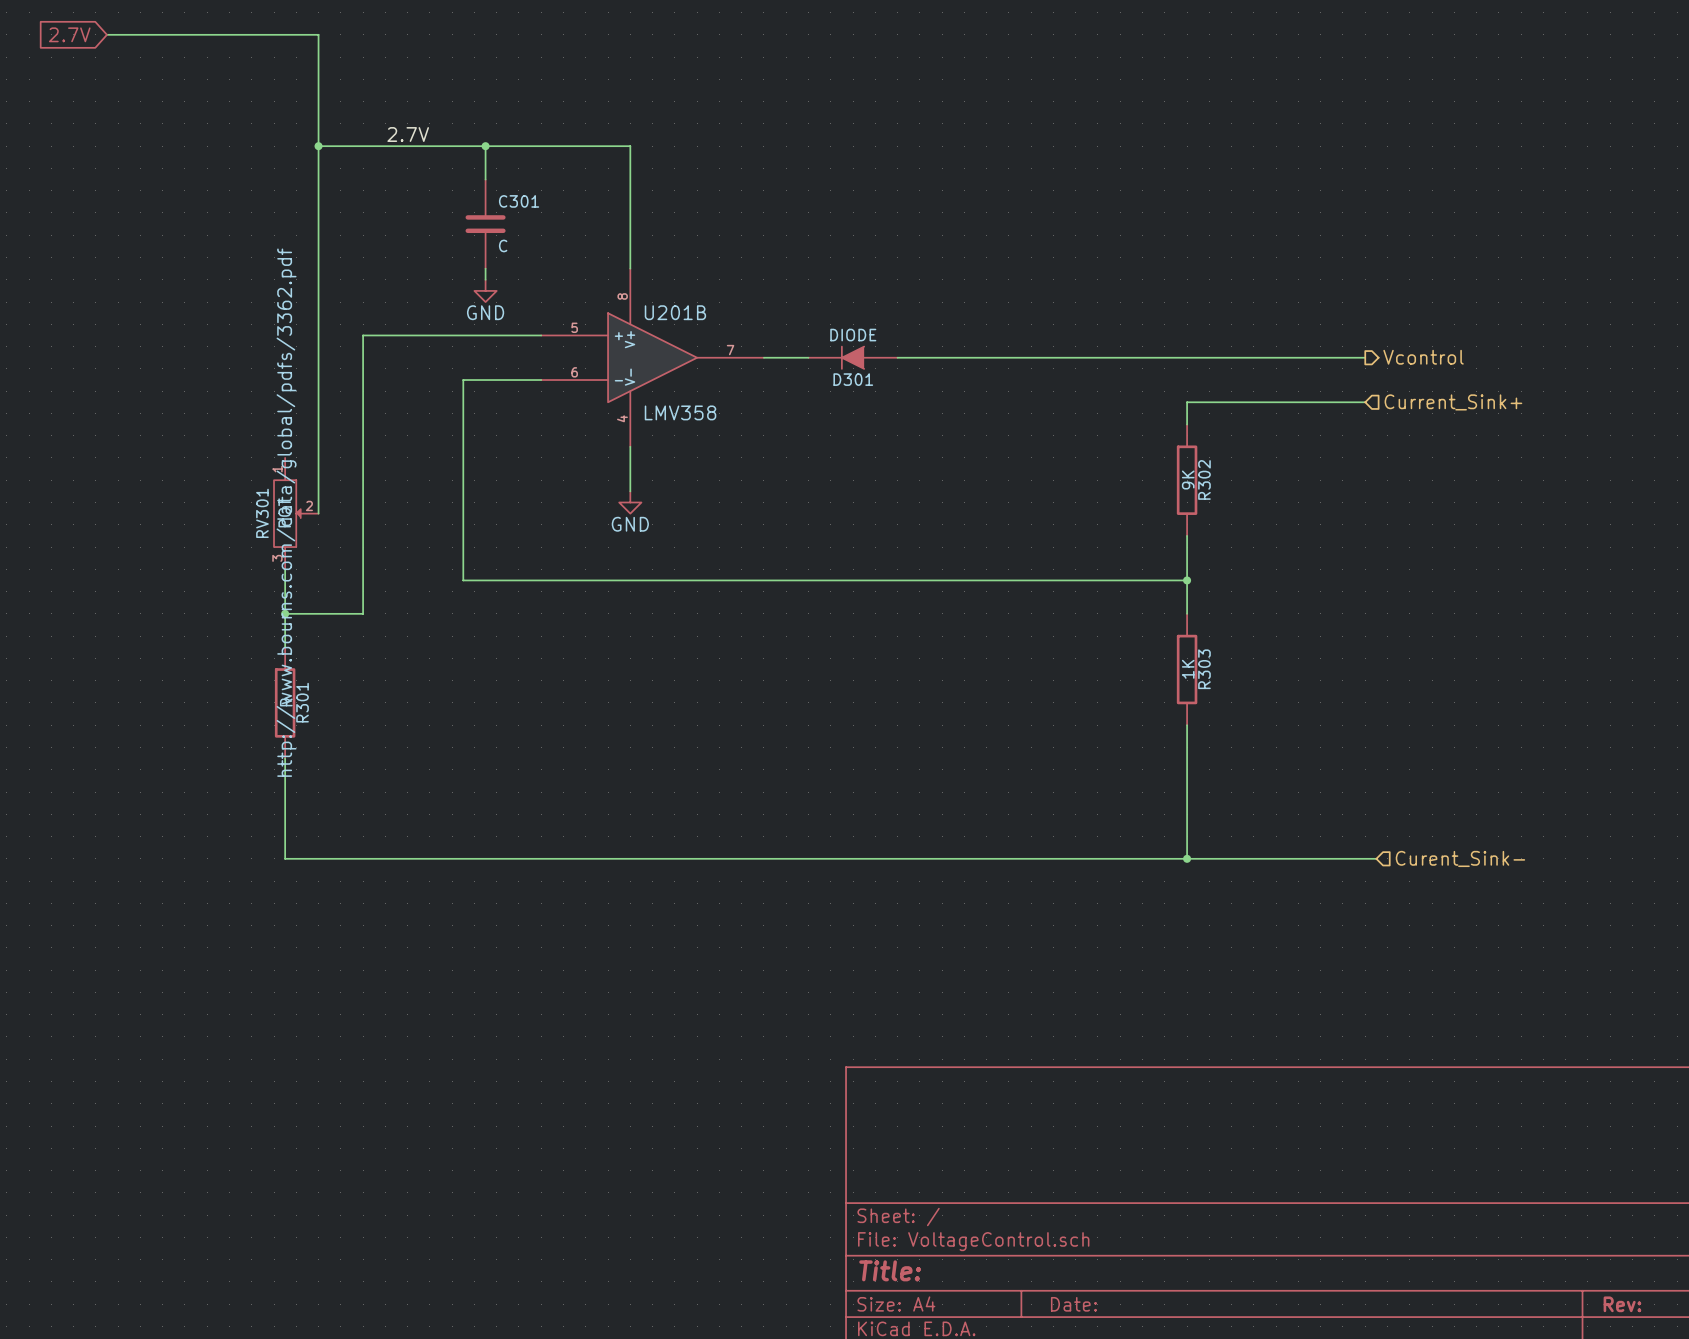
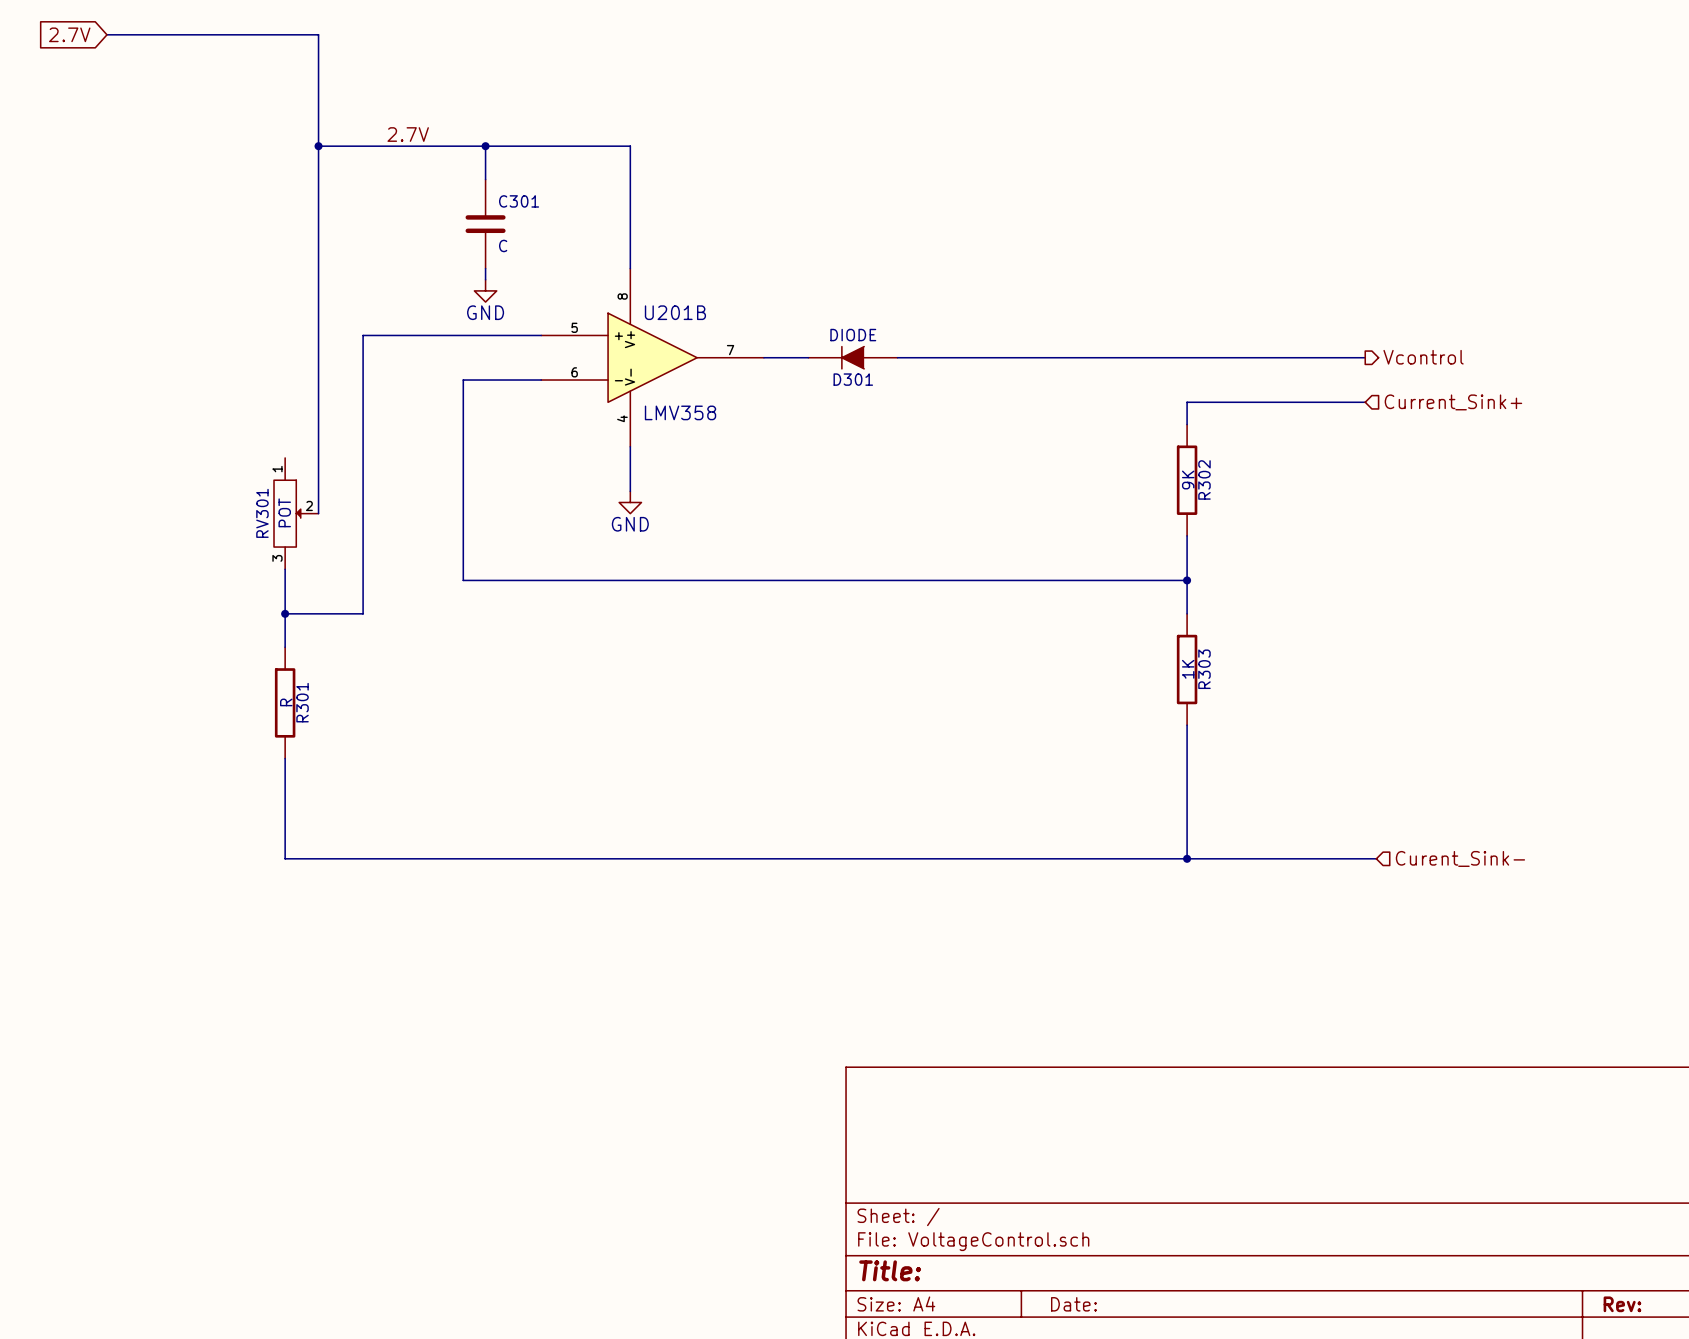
RV301 text: http://www.bourns.com/data/global/pdfs/3362.pdf (286, 512) -> none

